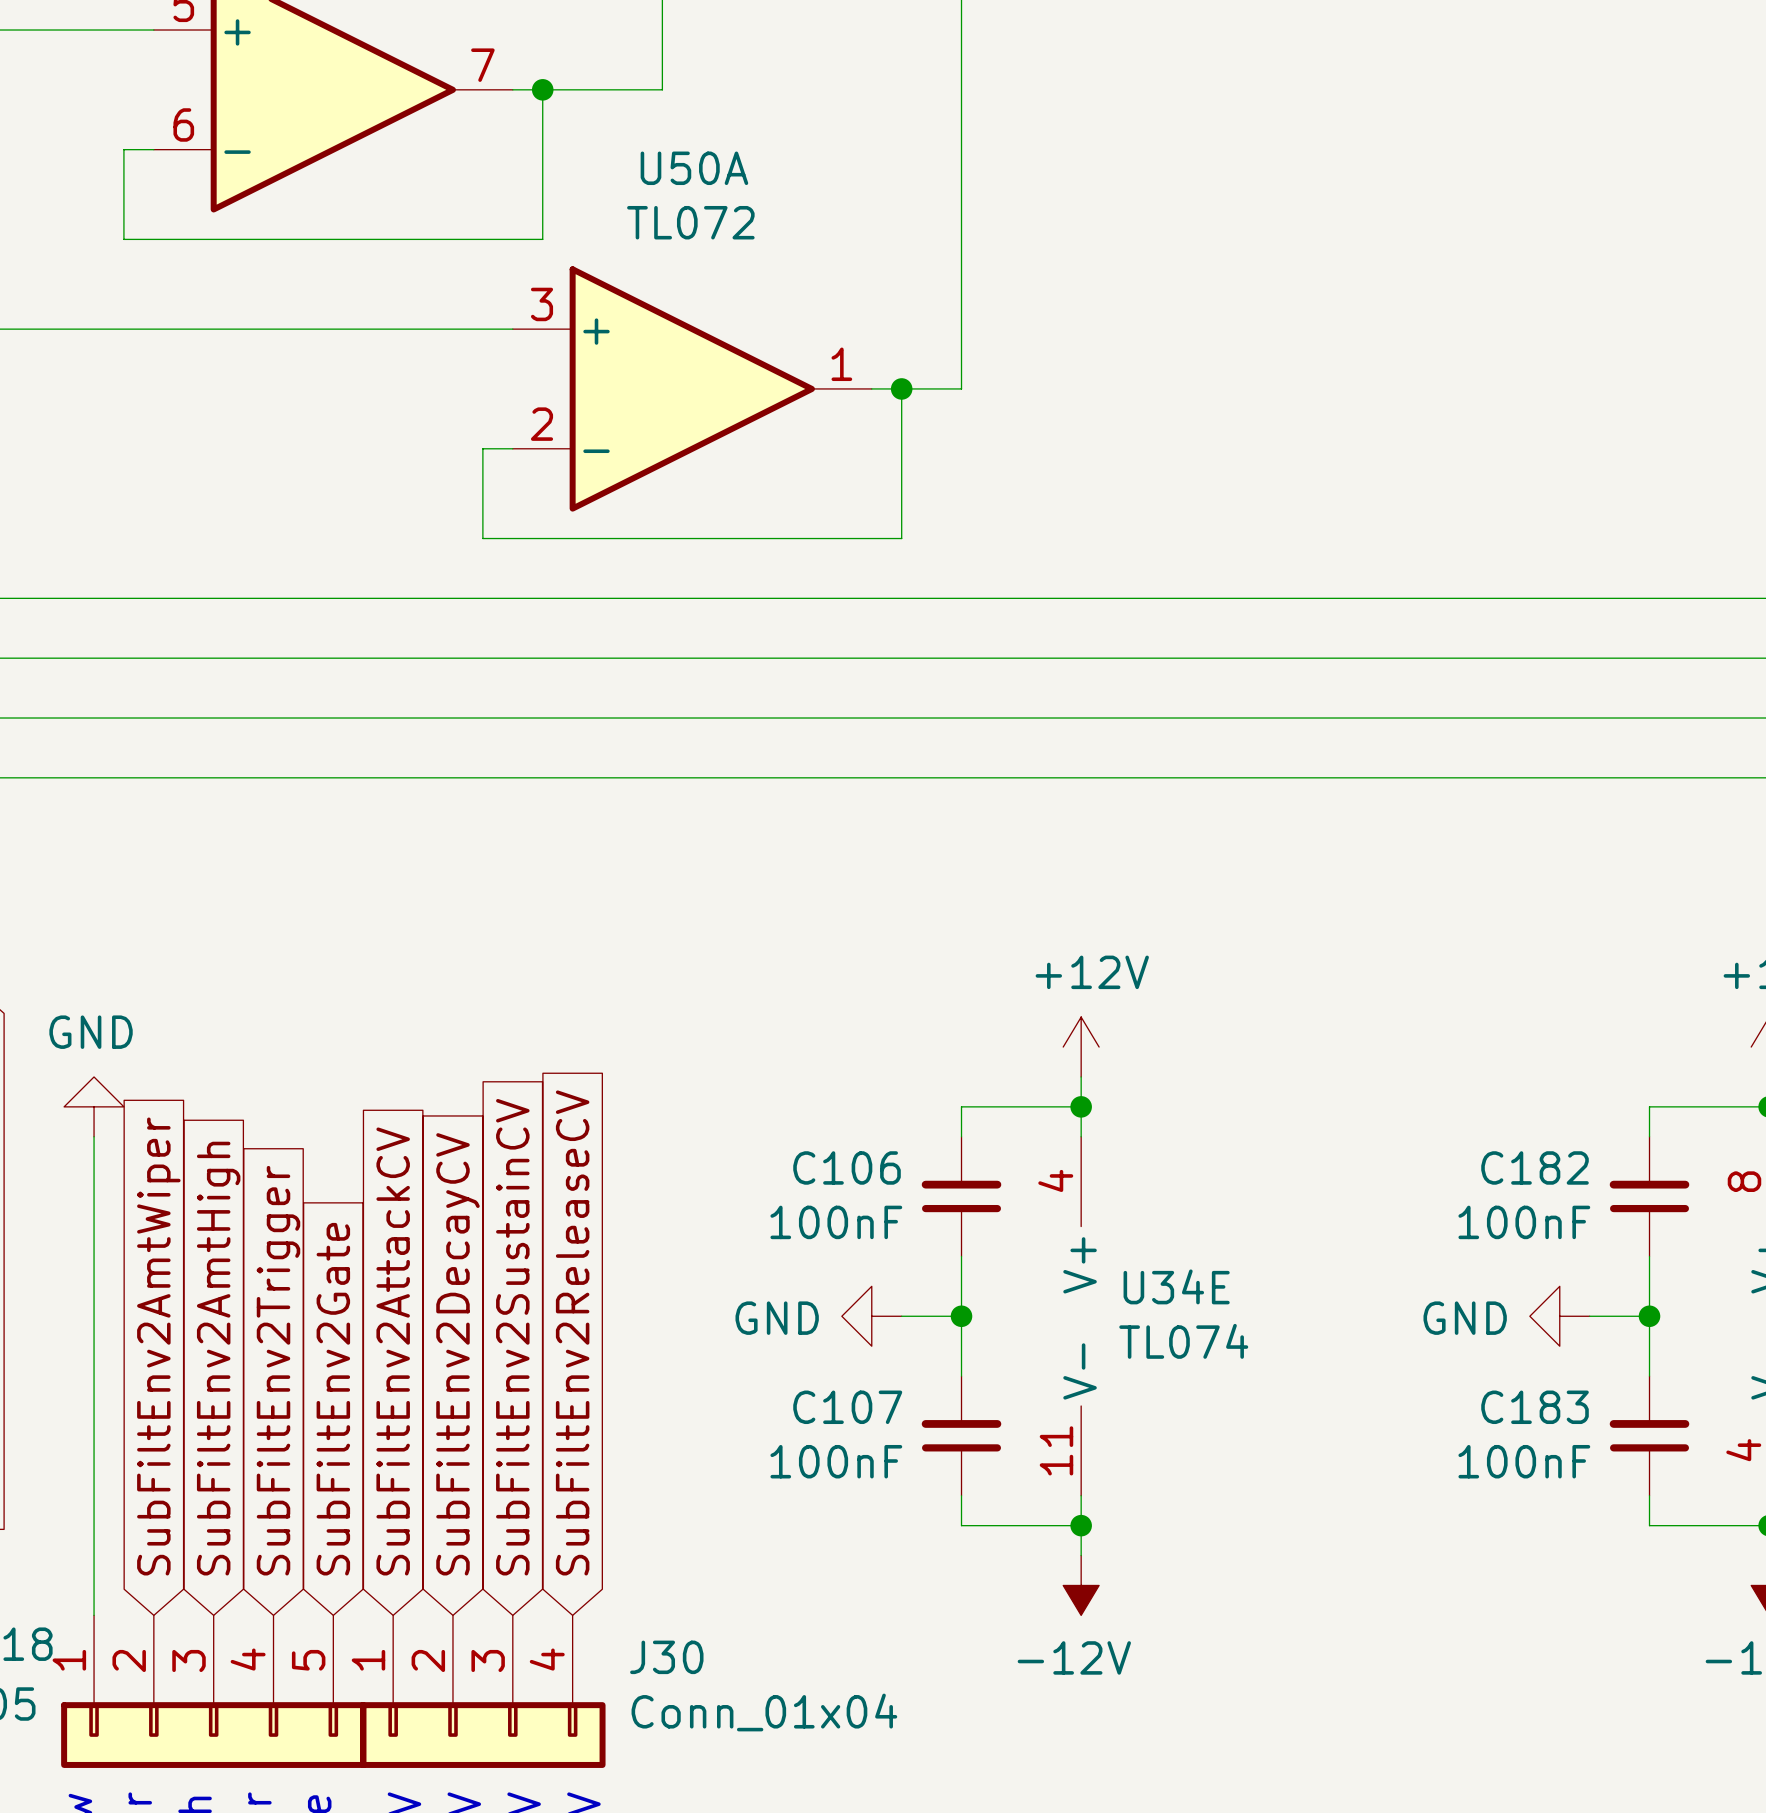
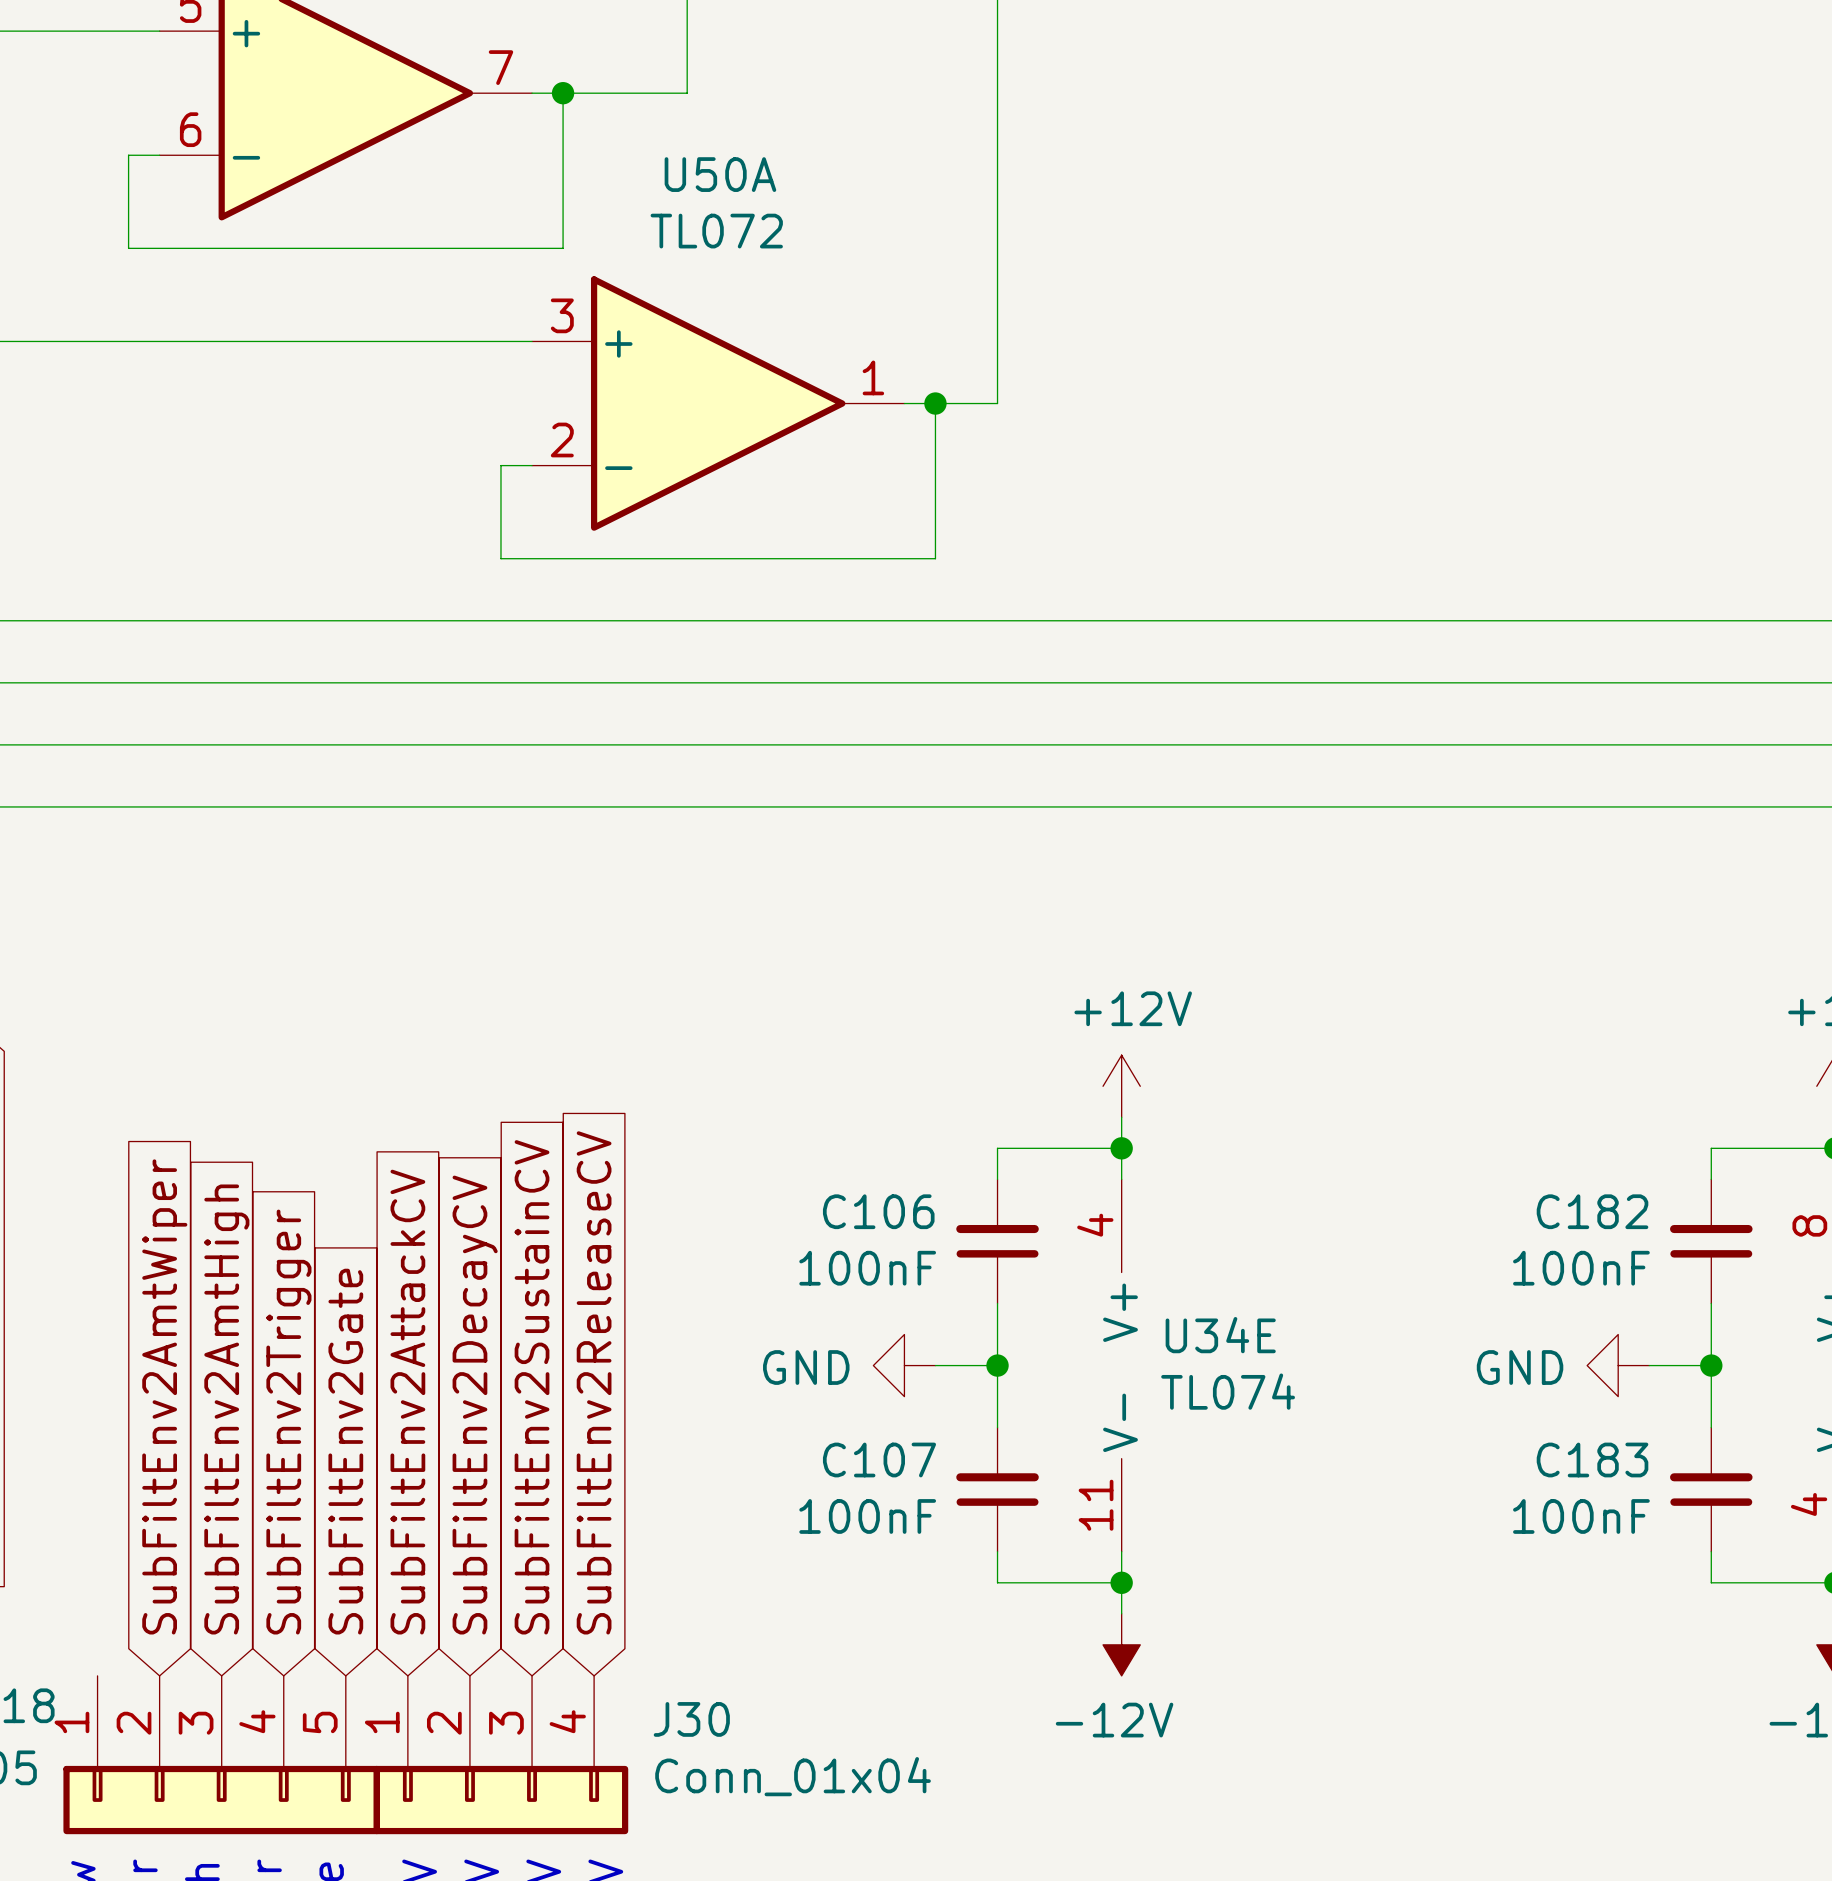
power symbol: GND (94, 1106) -> none
wire: (94, 1136) (94, 1615) -> none

